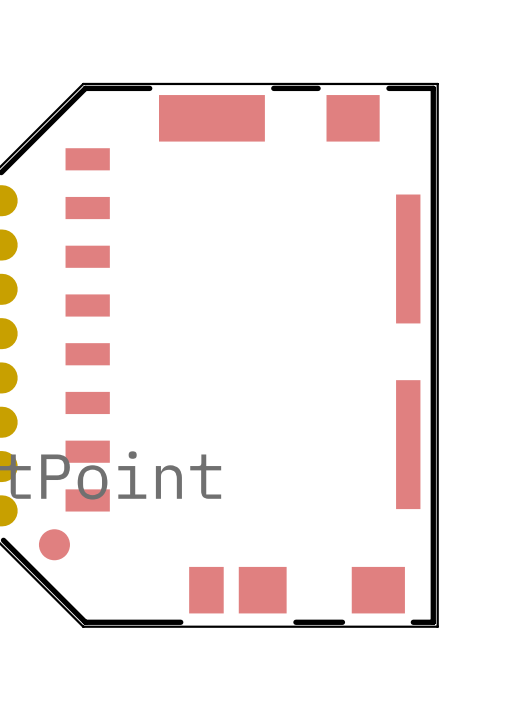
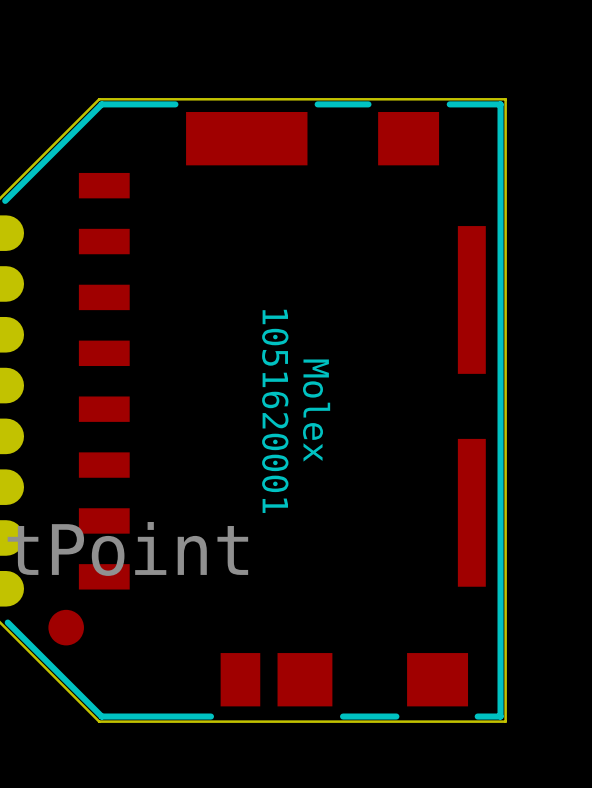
text: none -> 1051620001 (275, 411)
text: none -> Molex (316, 410)

